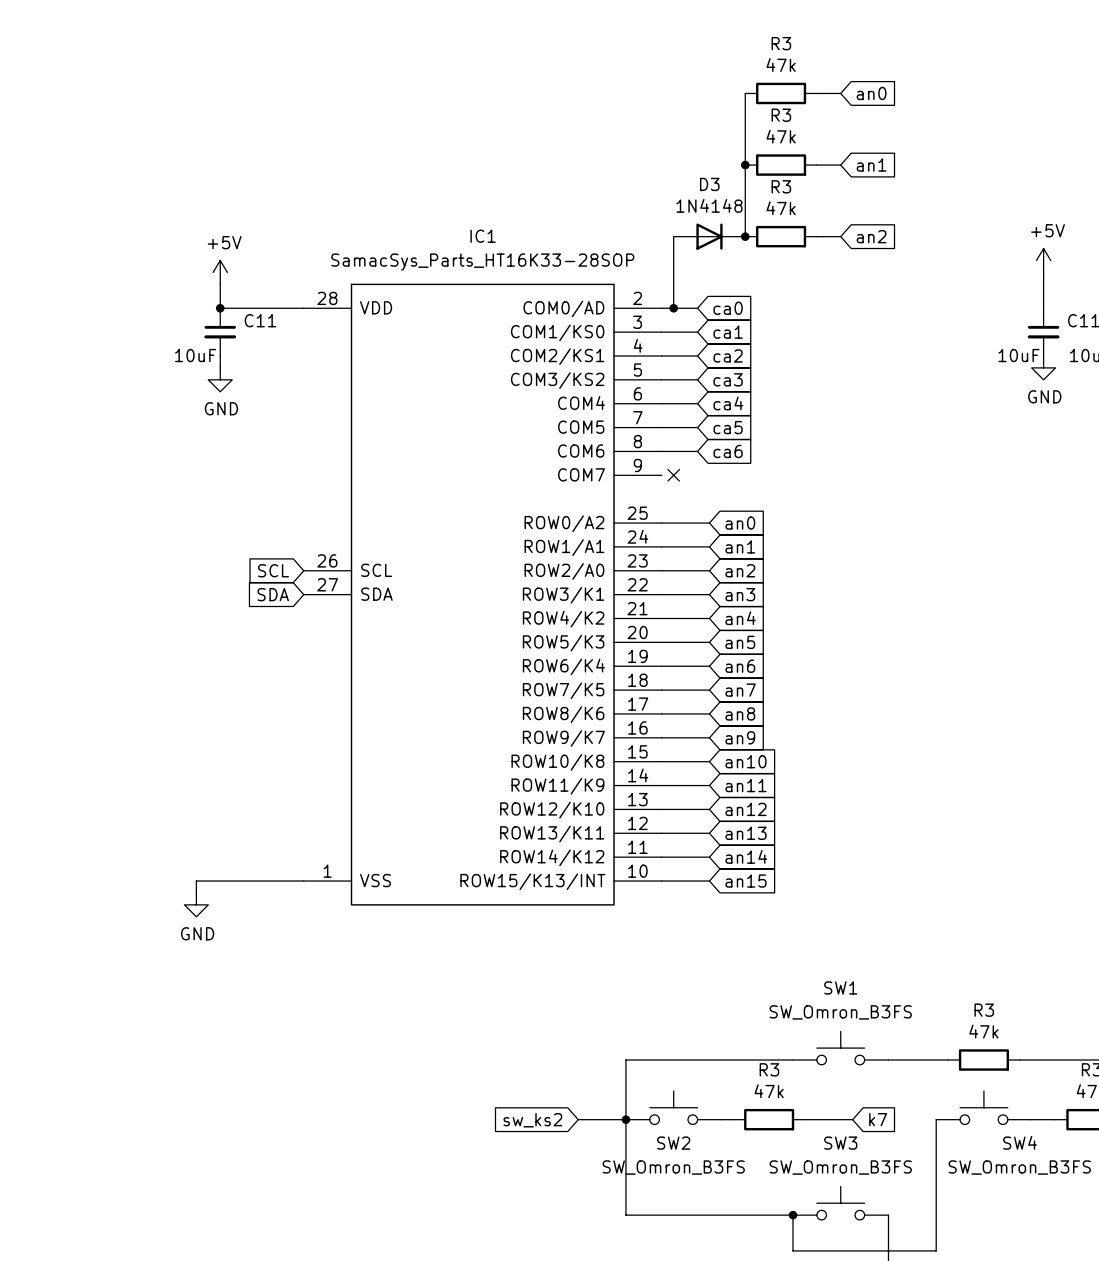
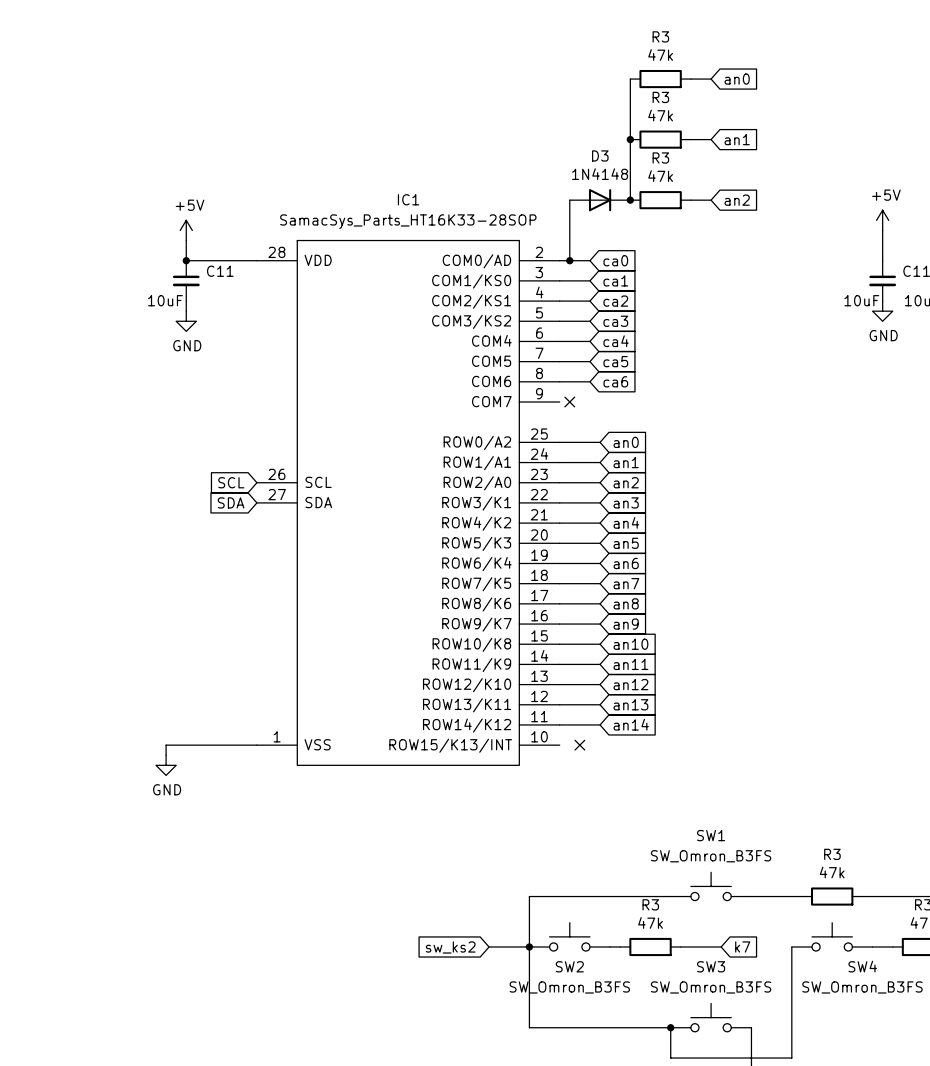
wire: (661, 881) (709, 881) -> none
no-connect mark: none -> (579, 745)
global label: an15 (746, 881) -> none

